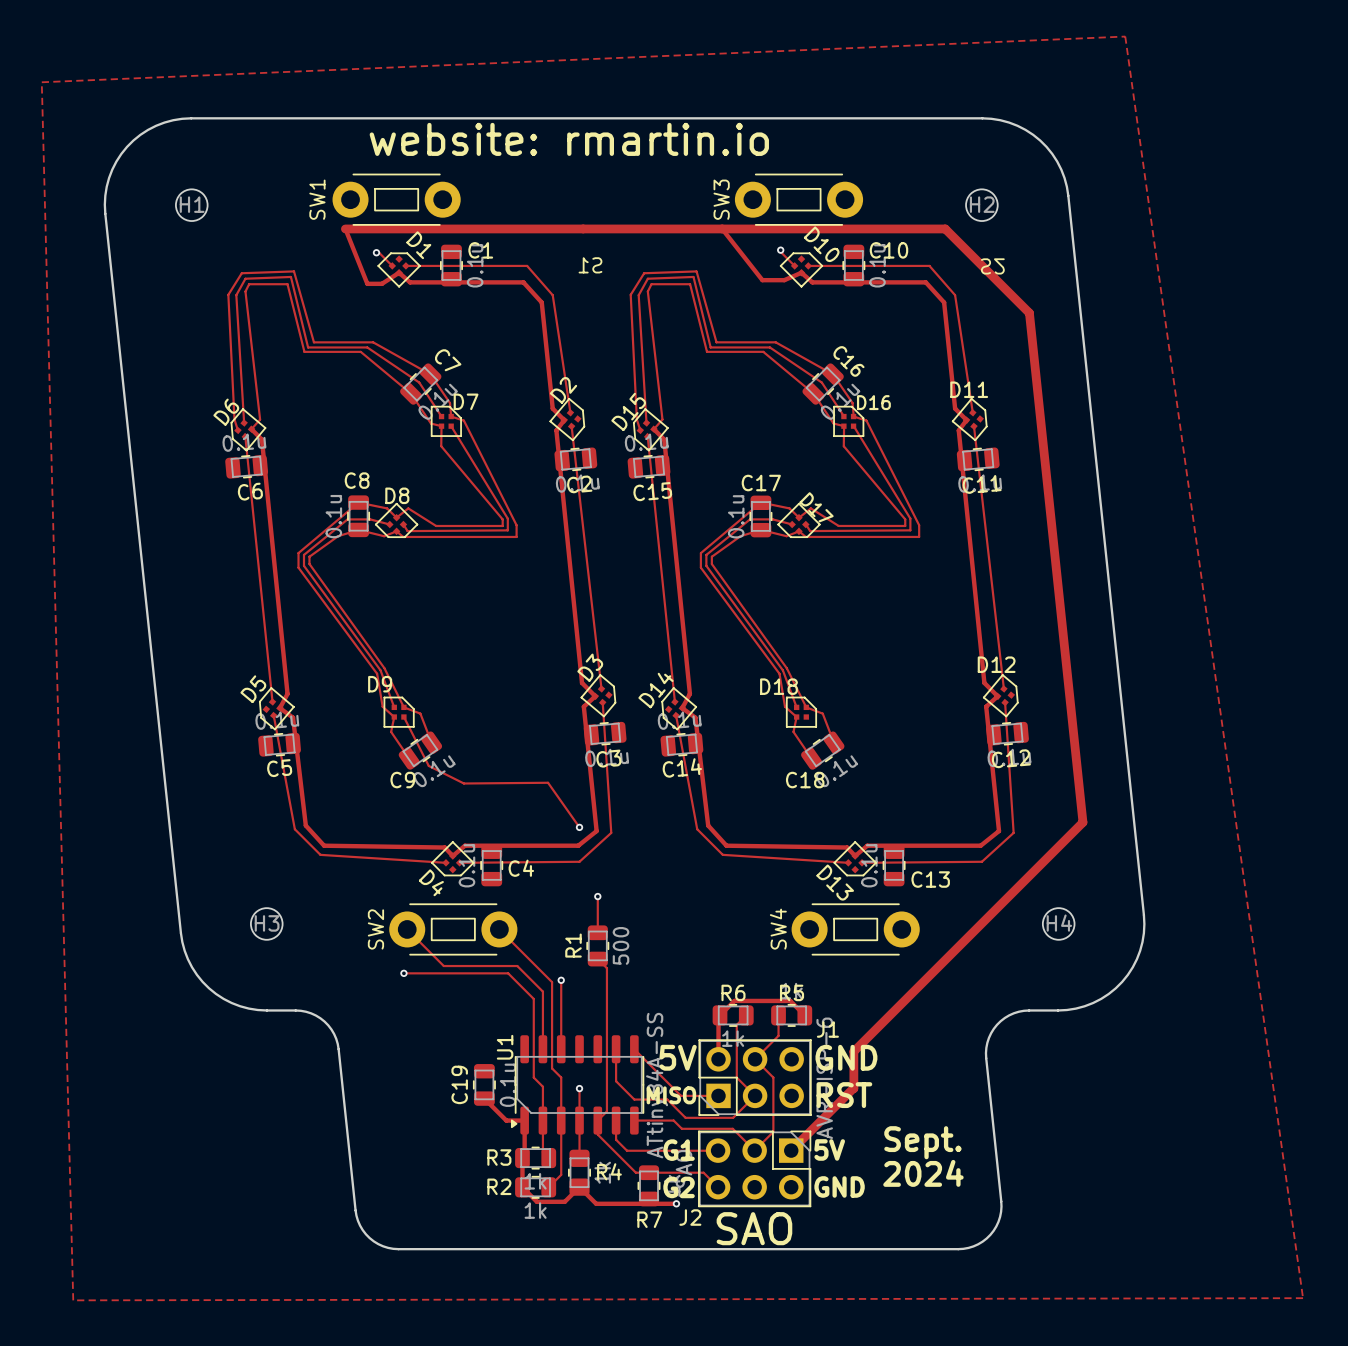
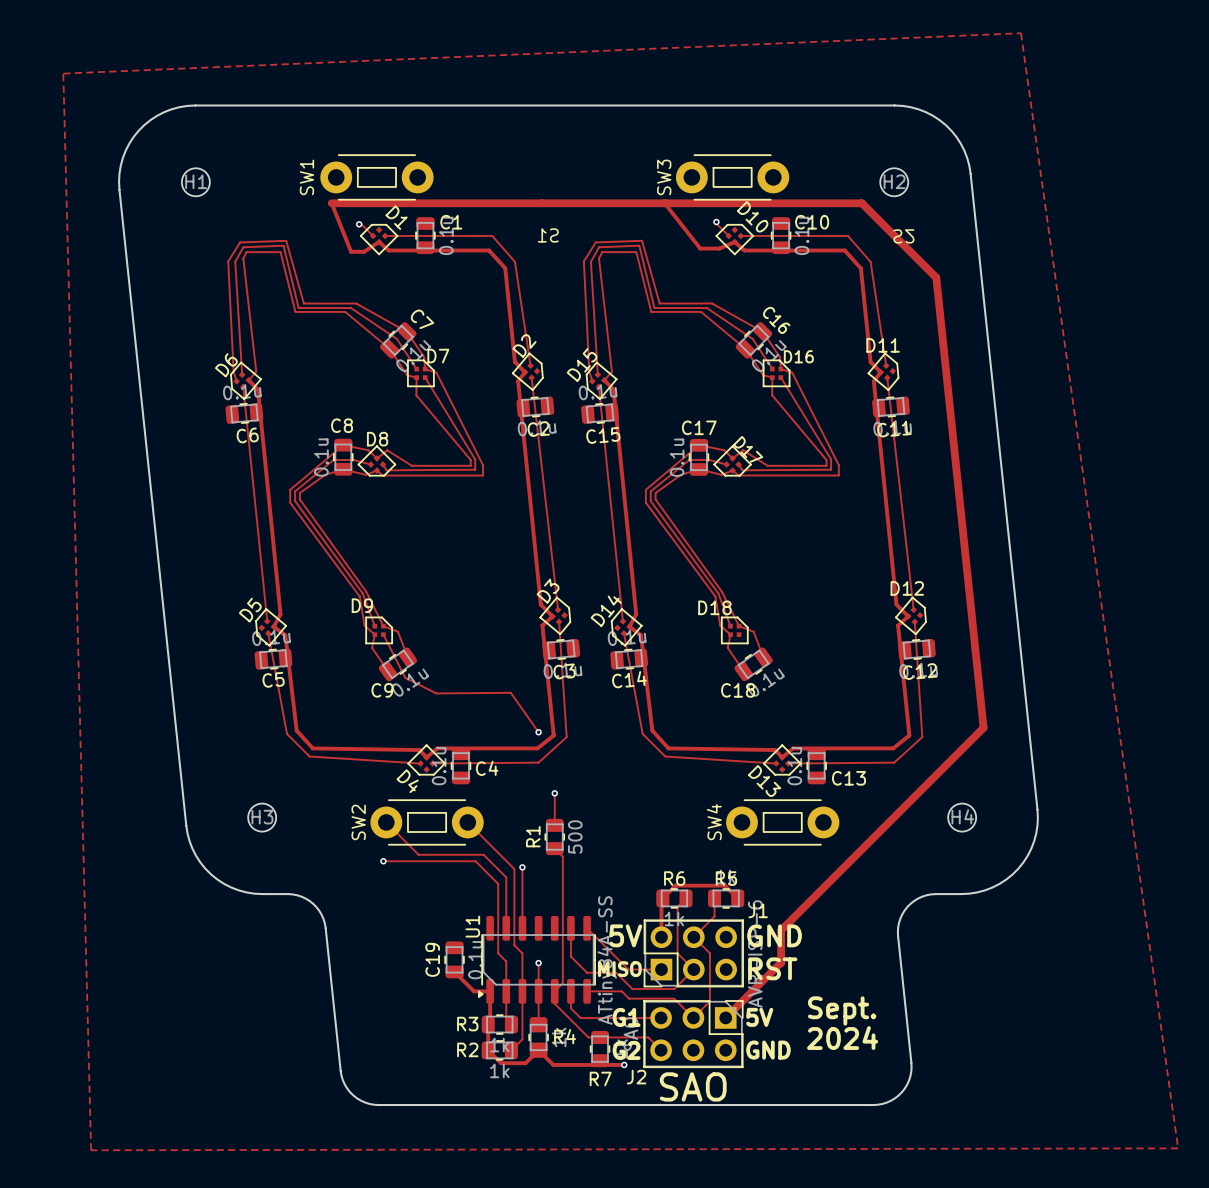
text: website: rmartin.io (569, 139) -> none

